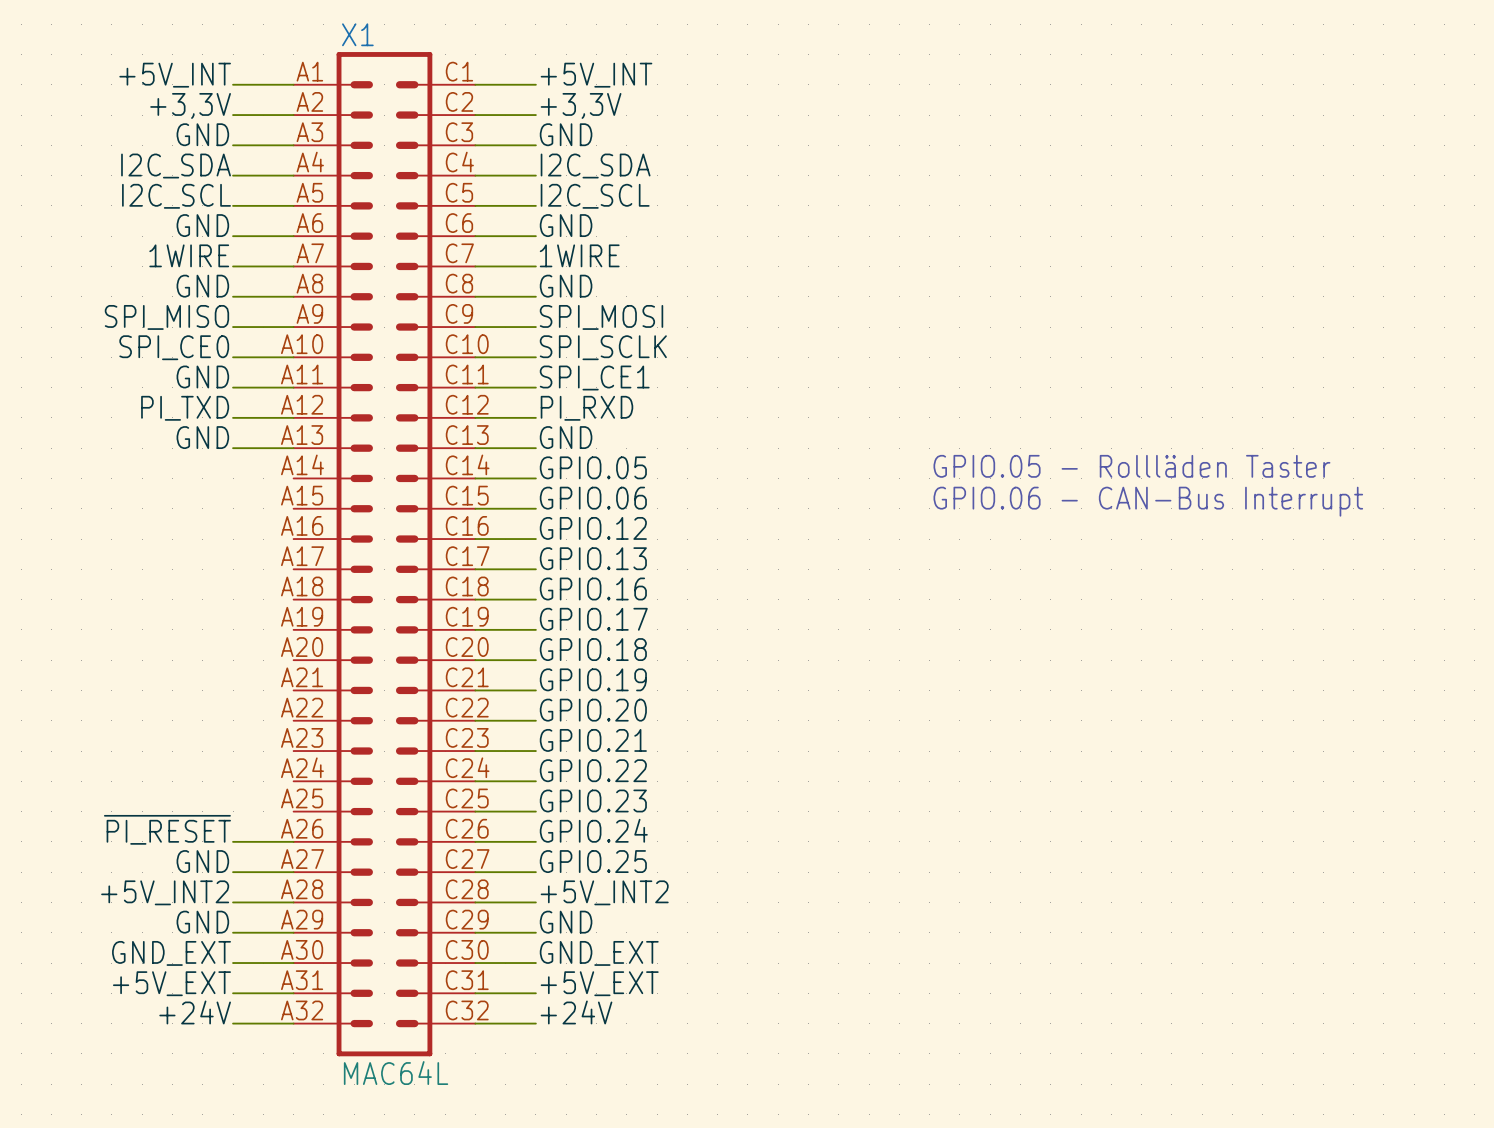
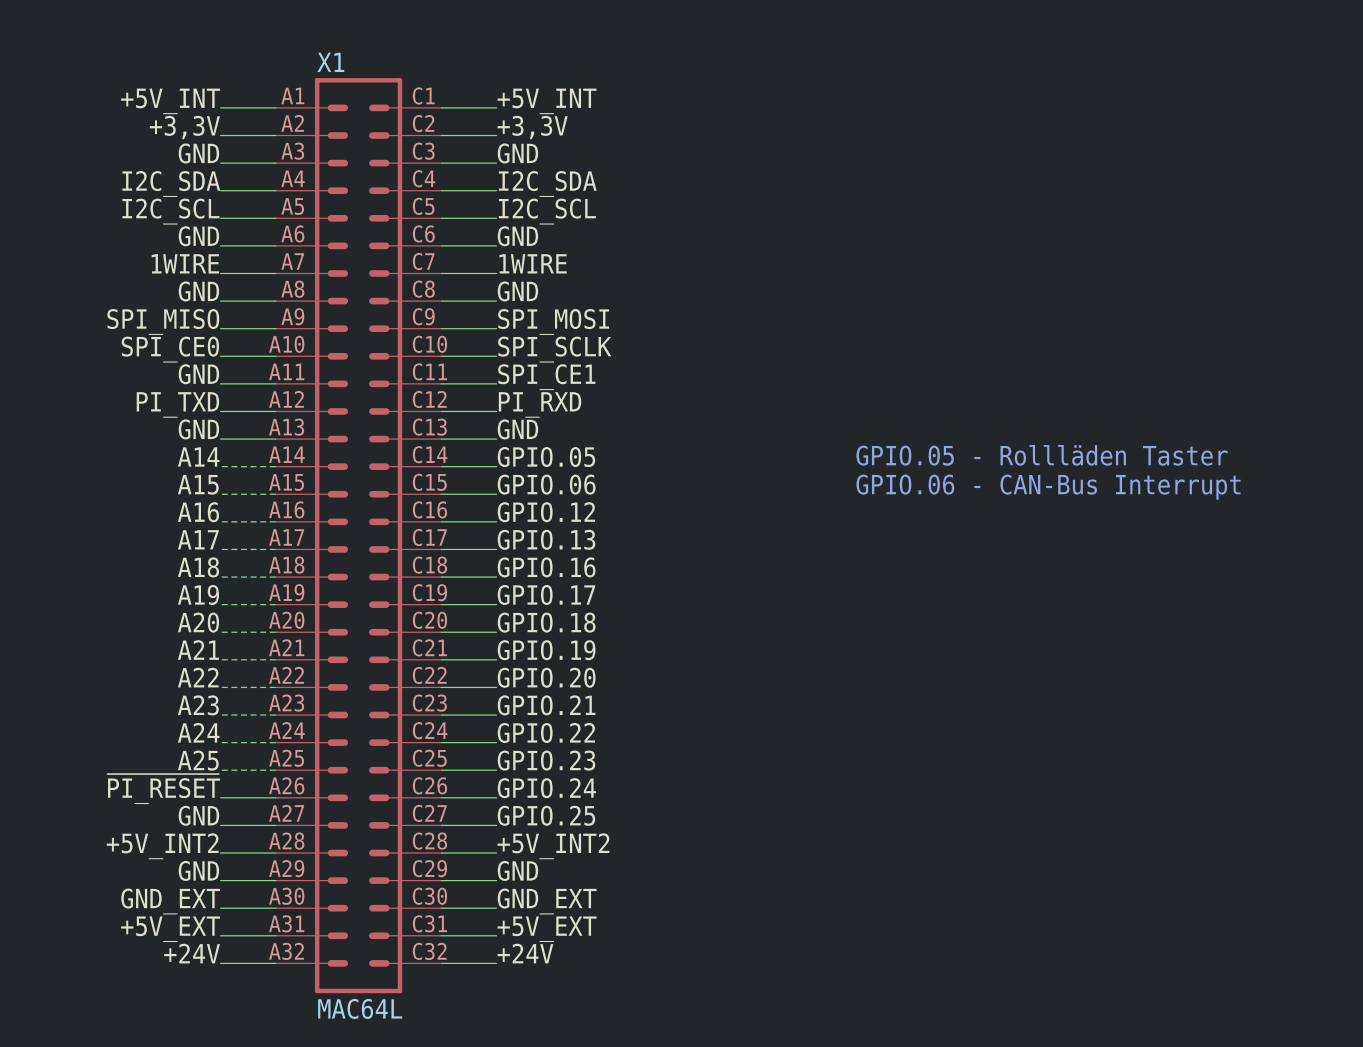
label: none -> A14 (198, 457)
wire: none -> (220, 466) (275, 466)
label: none -> A15 (198, 484)
wire: none -> (220, 494) (275, 494)
label: none -> A16 (198, 512)
wire: none -> (220, 521) (275, 521)
label: none -> A17 (198, 539)
wire: none -> (220, 549) (275, 549)
label: none -> A18 (198, 567)
wire: none -> (220, 577) (275, 577)
label: none -> A19 (198, 594)
wire: none -> (220, 604) (275, 604)
label: none -> A20 (198, 622)
wire: none -> (220, 632) (275, 632)
label: none -> A21 (198, 650)
wire: none -> (220, 659) (275, 659)
label: none -> A22 (198, 677)
wire: none -> (220, 687) (275, 687)
label: none -> A23 (198, 705)
wire: none -> (220, 715) (275, 715)
label: none -> A24 (198, 732)
wire: none -> (220, 742) (275, 742)
label: none -> A25 (198, 760)
wire: none -> (220, 770) (275, 770)

